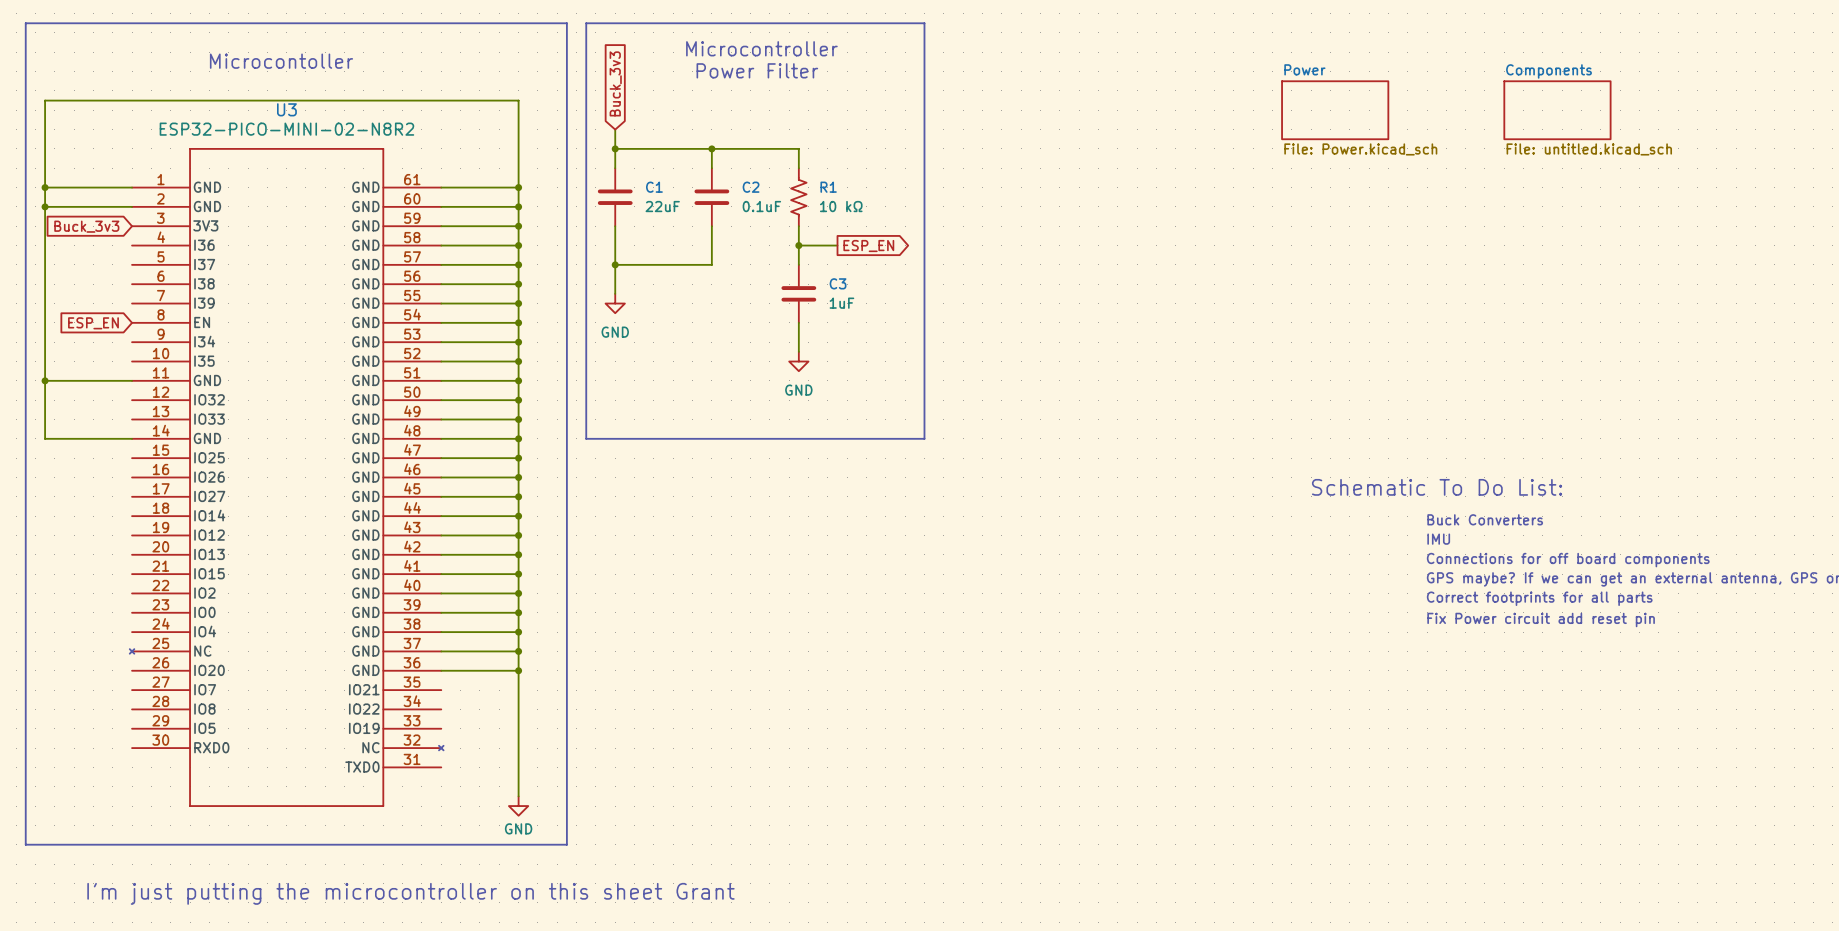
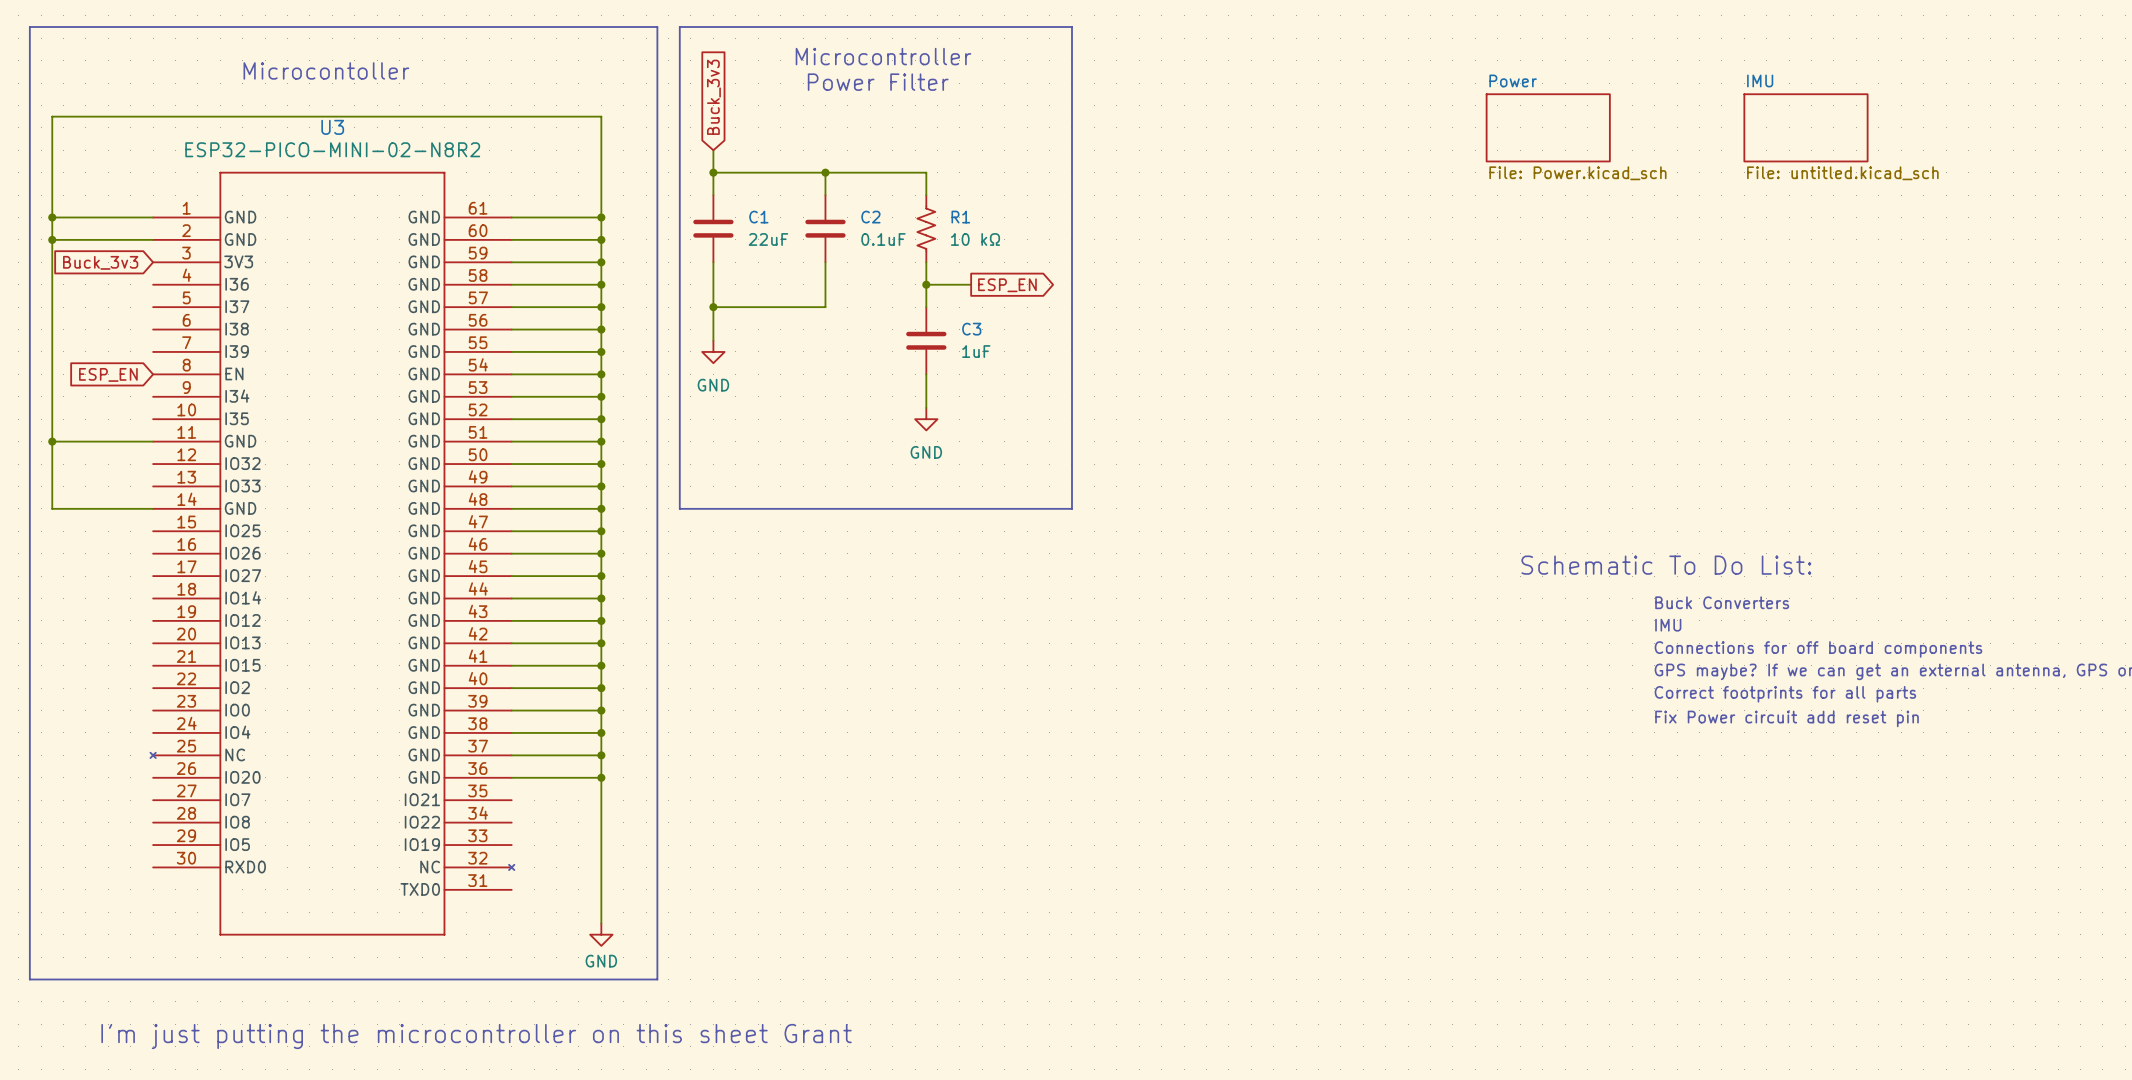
sheet Components name: Components (1549, 71) -> IMU (1760, 80)

